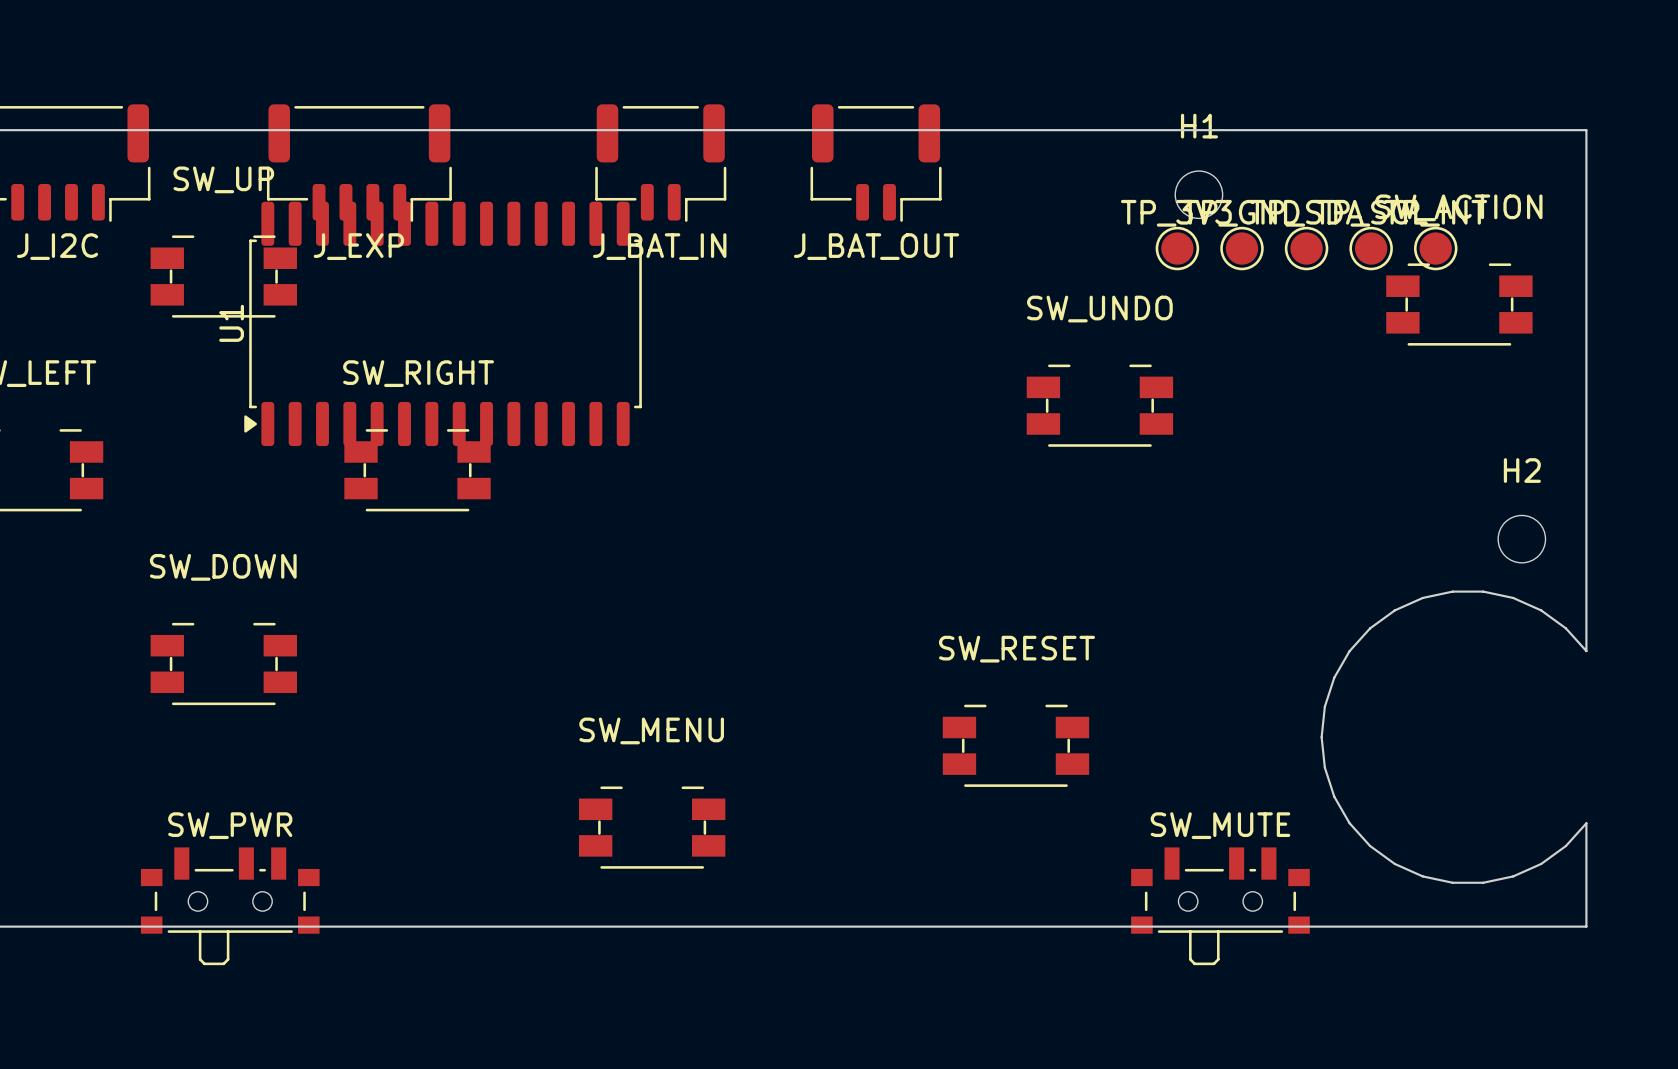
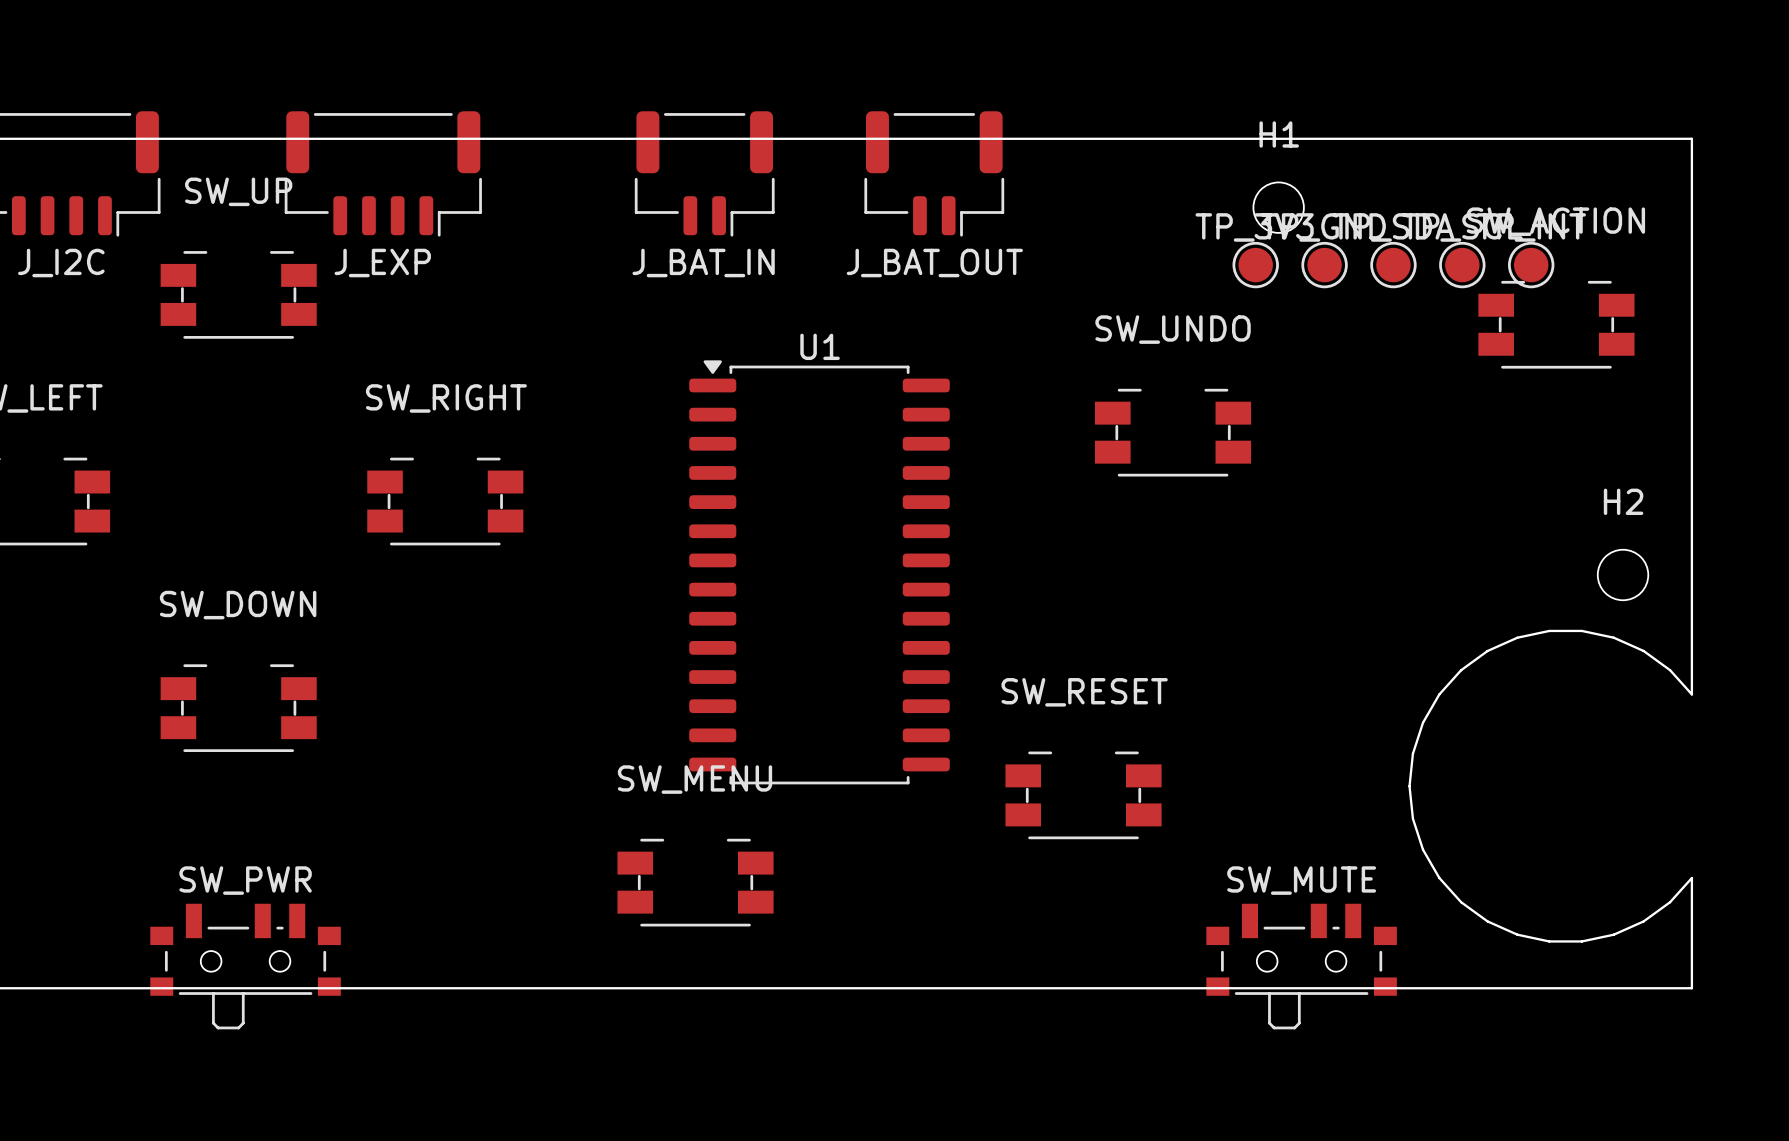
U1 rotation: 0° (443, 323) -> 90° clockwise (819, 572)
U1 position: (443, 323) -> (819, 572)

